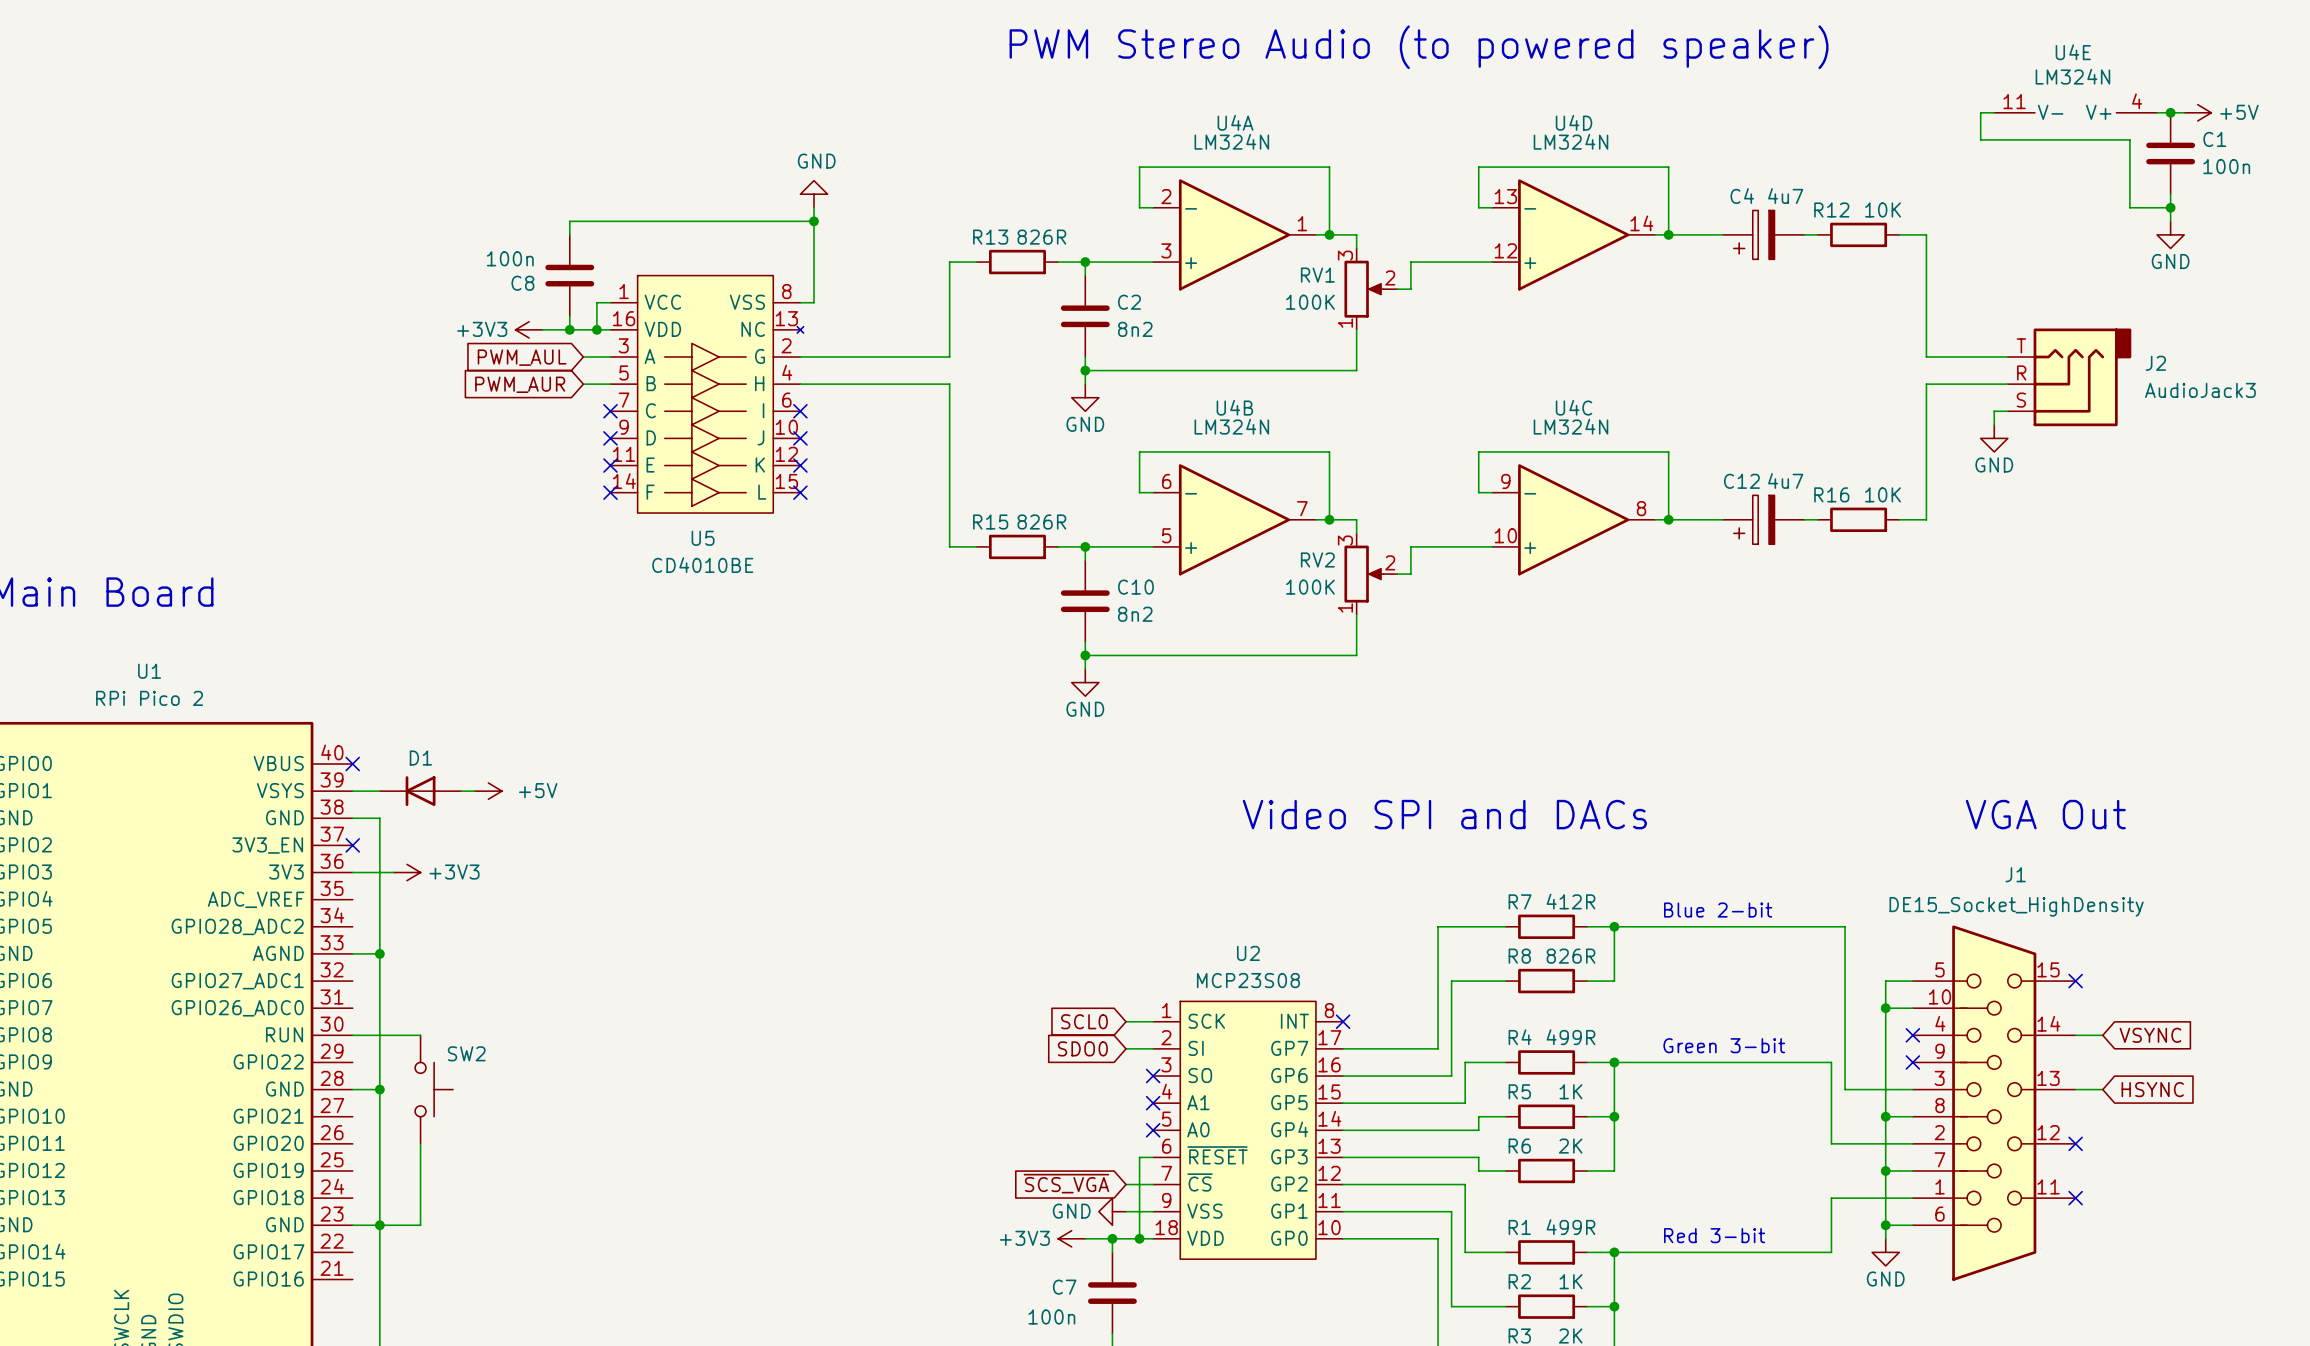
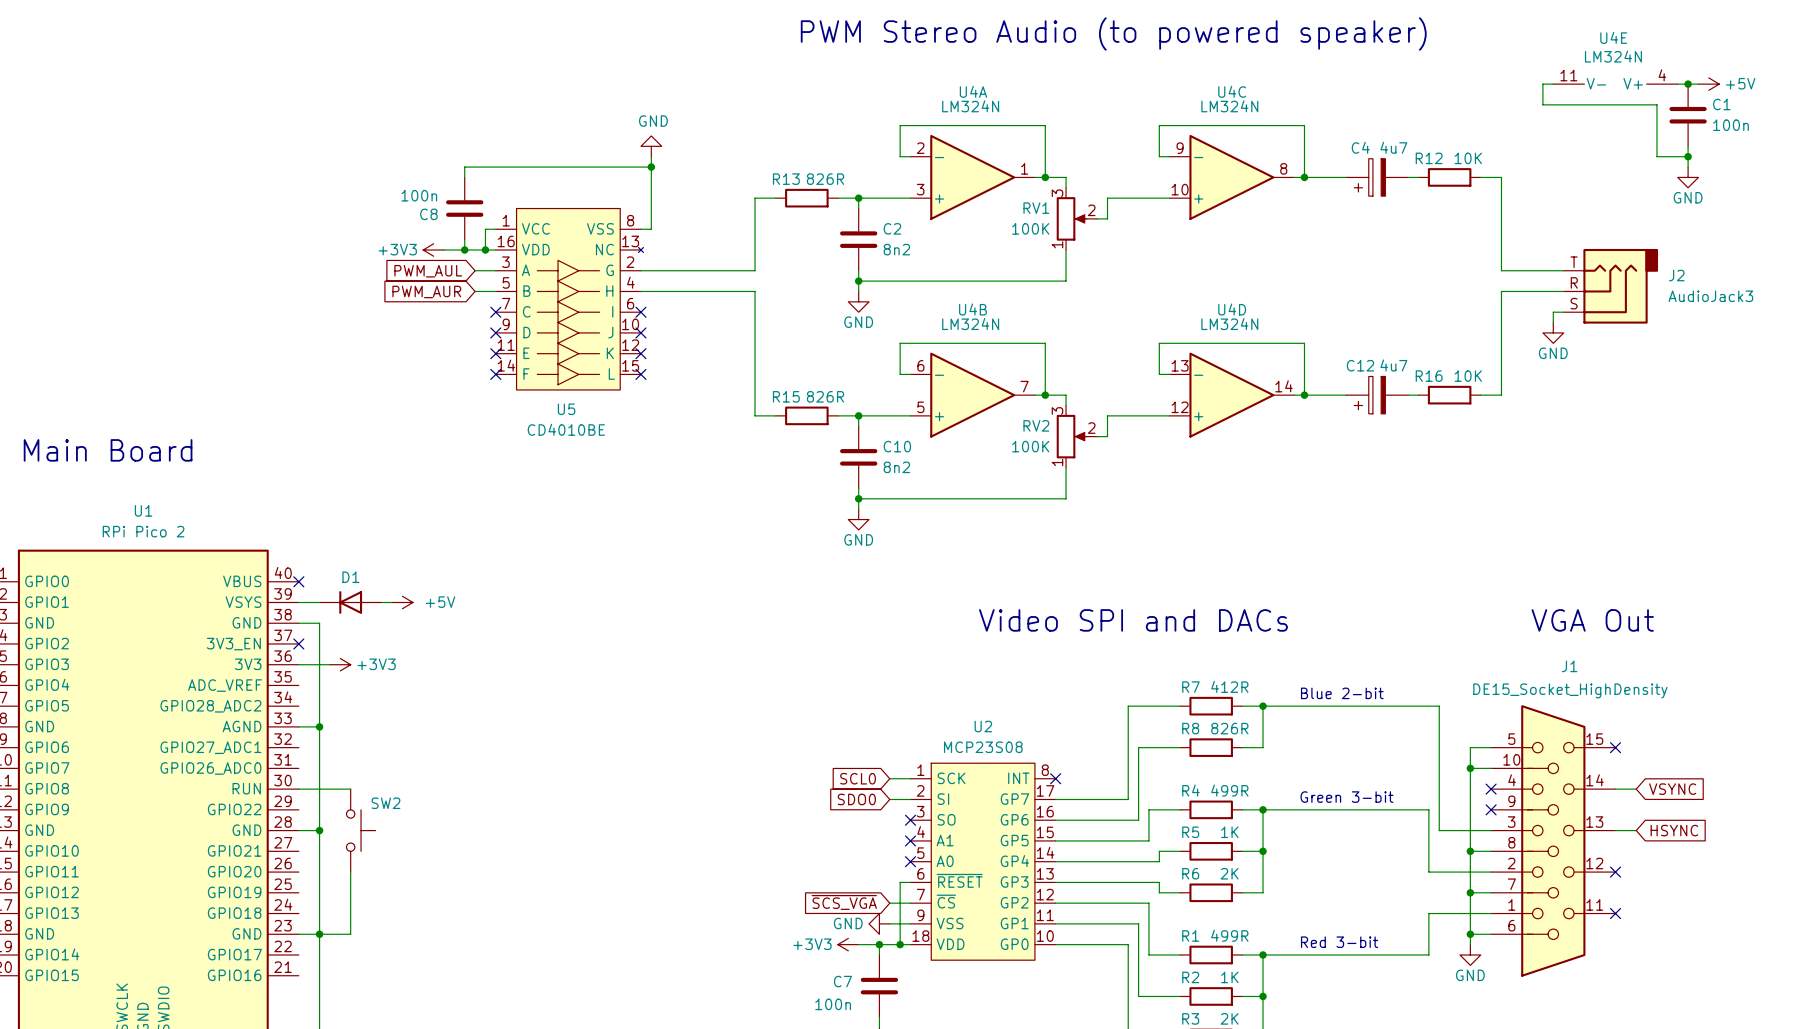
U4D position: (1573, 234) -> (1231, 395)
U4C position: (1573, 519) -> (1231, 177)

